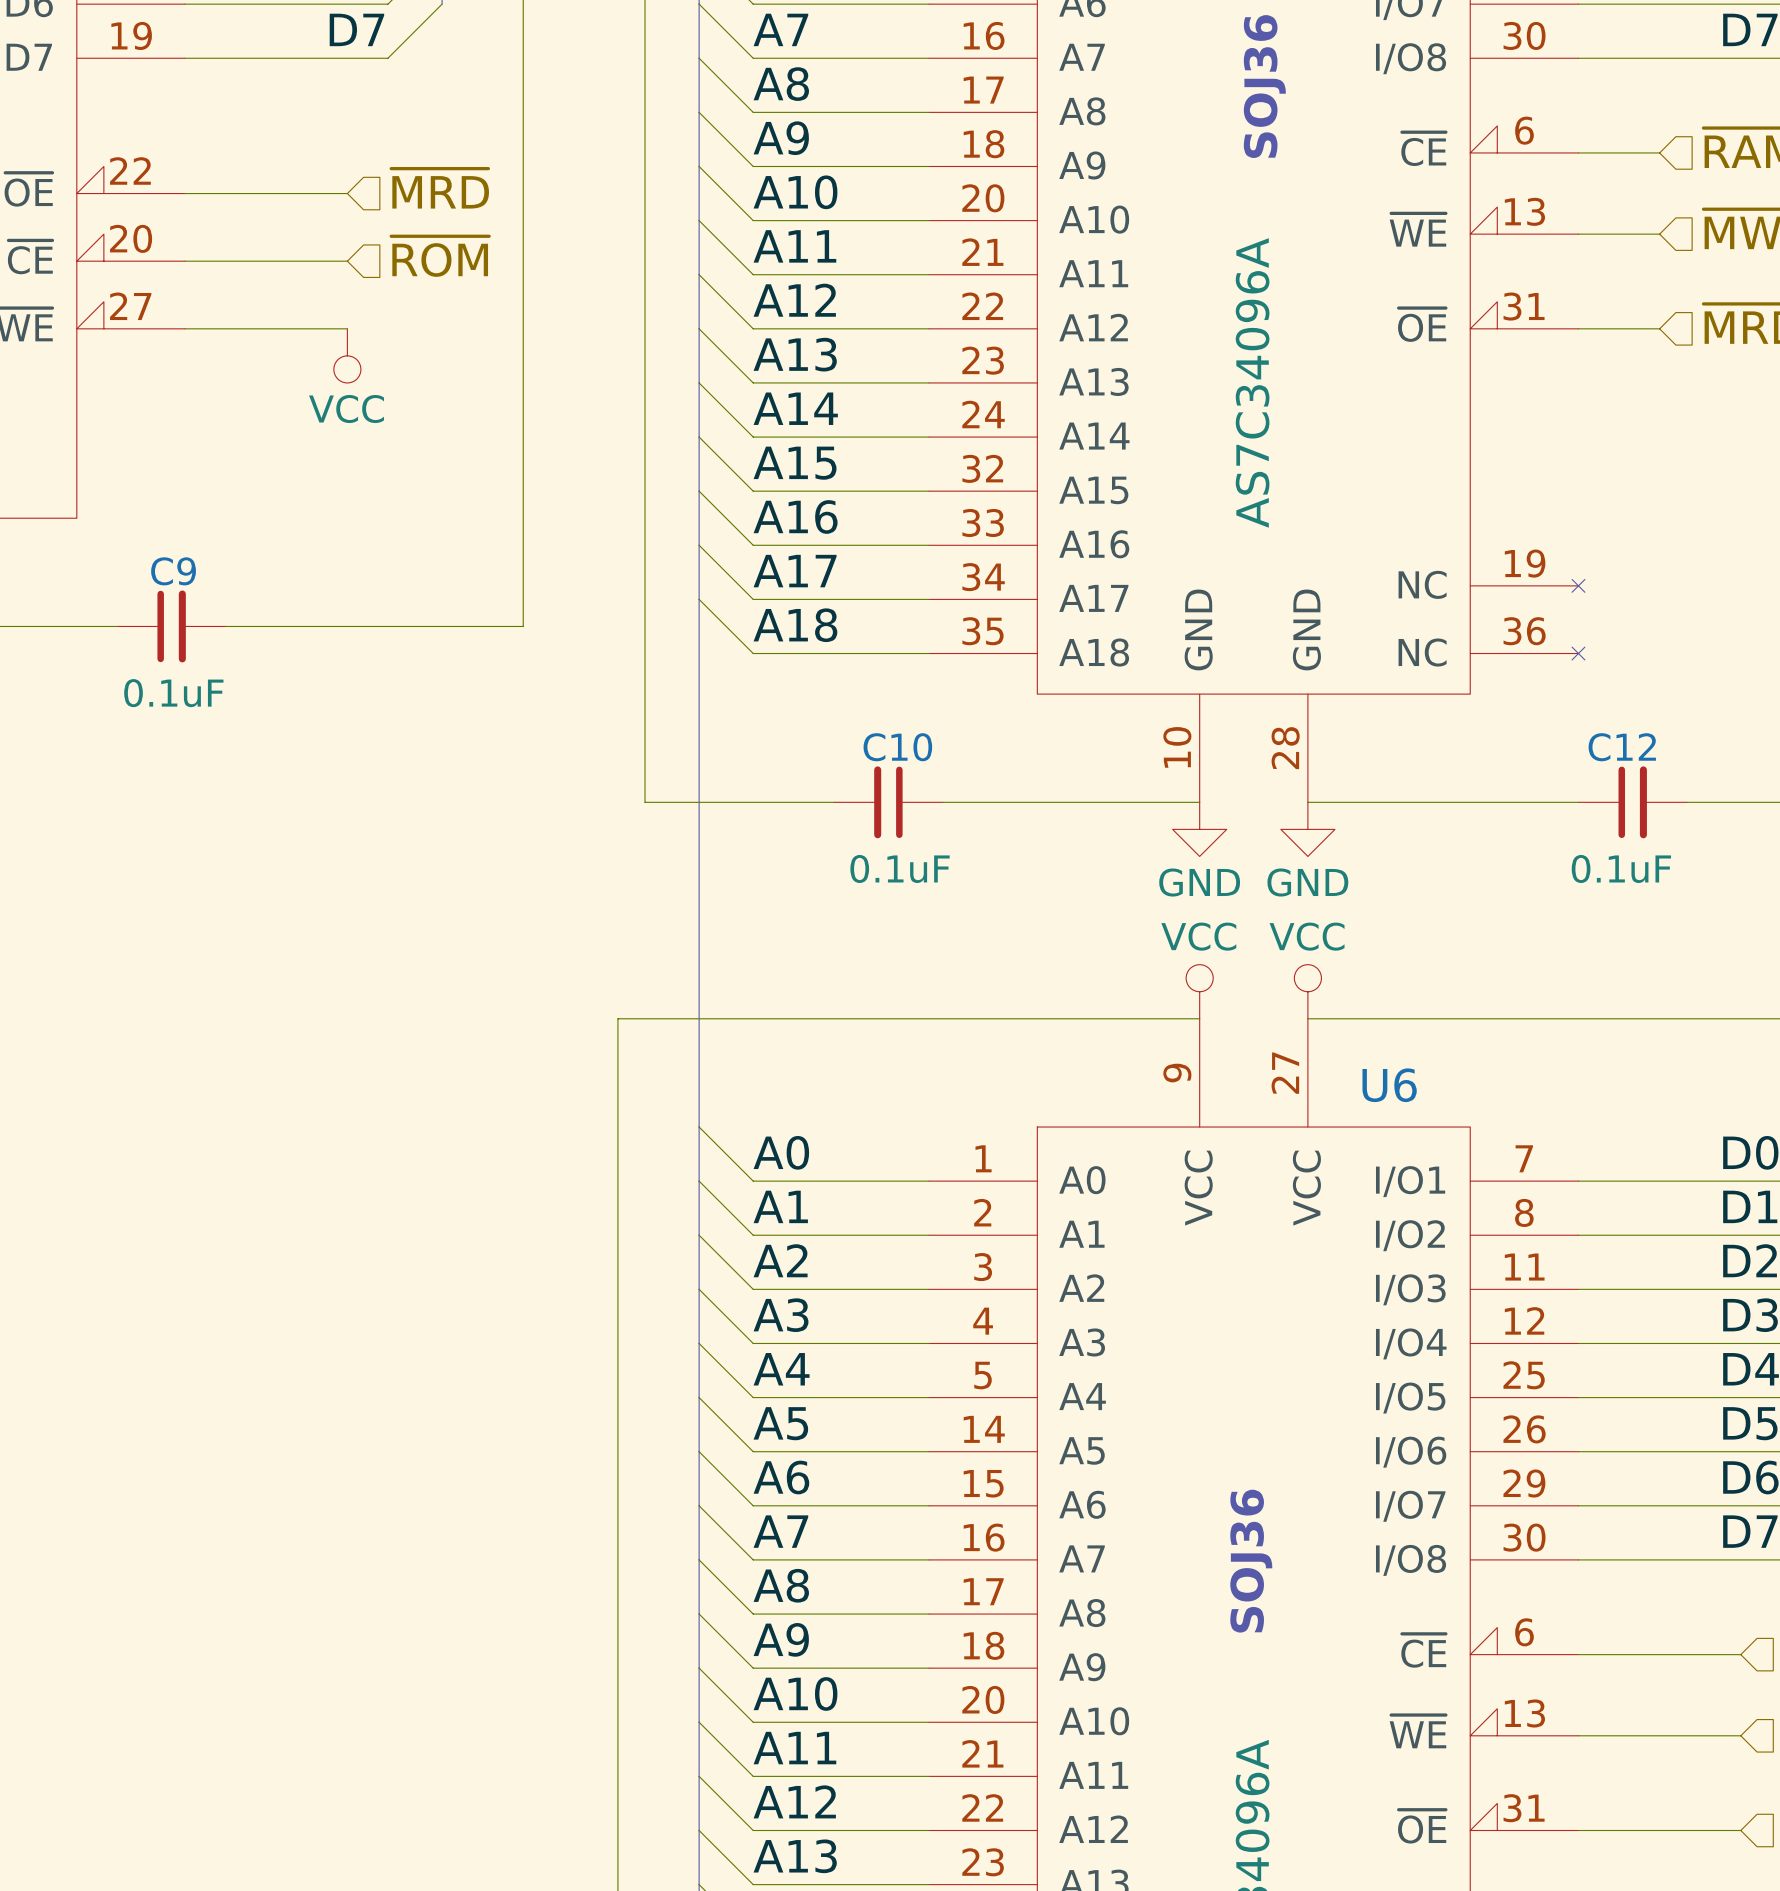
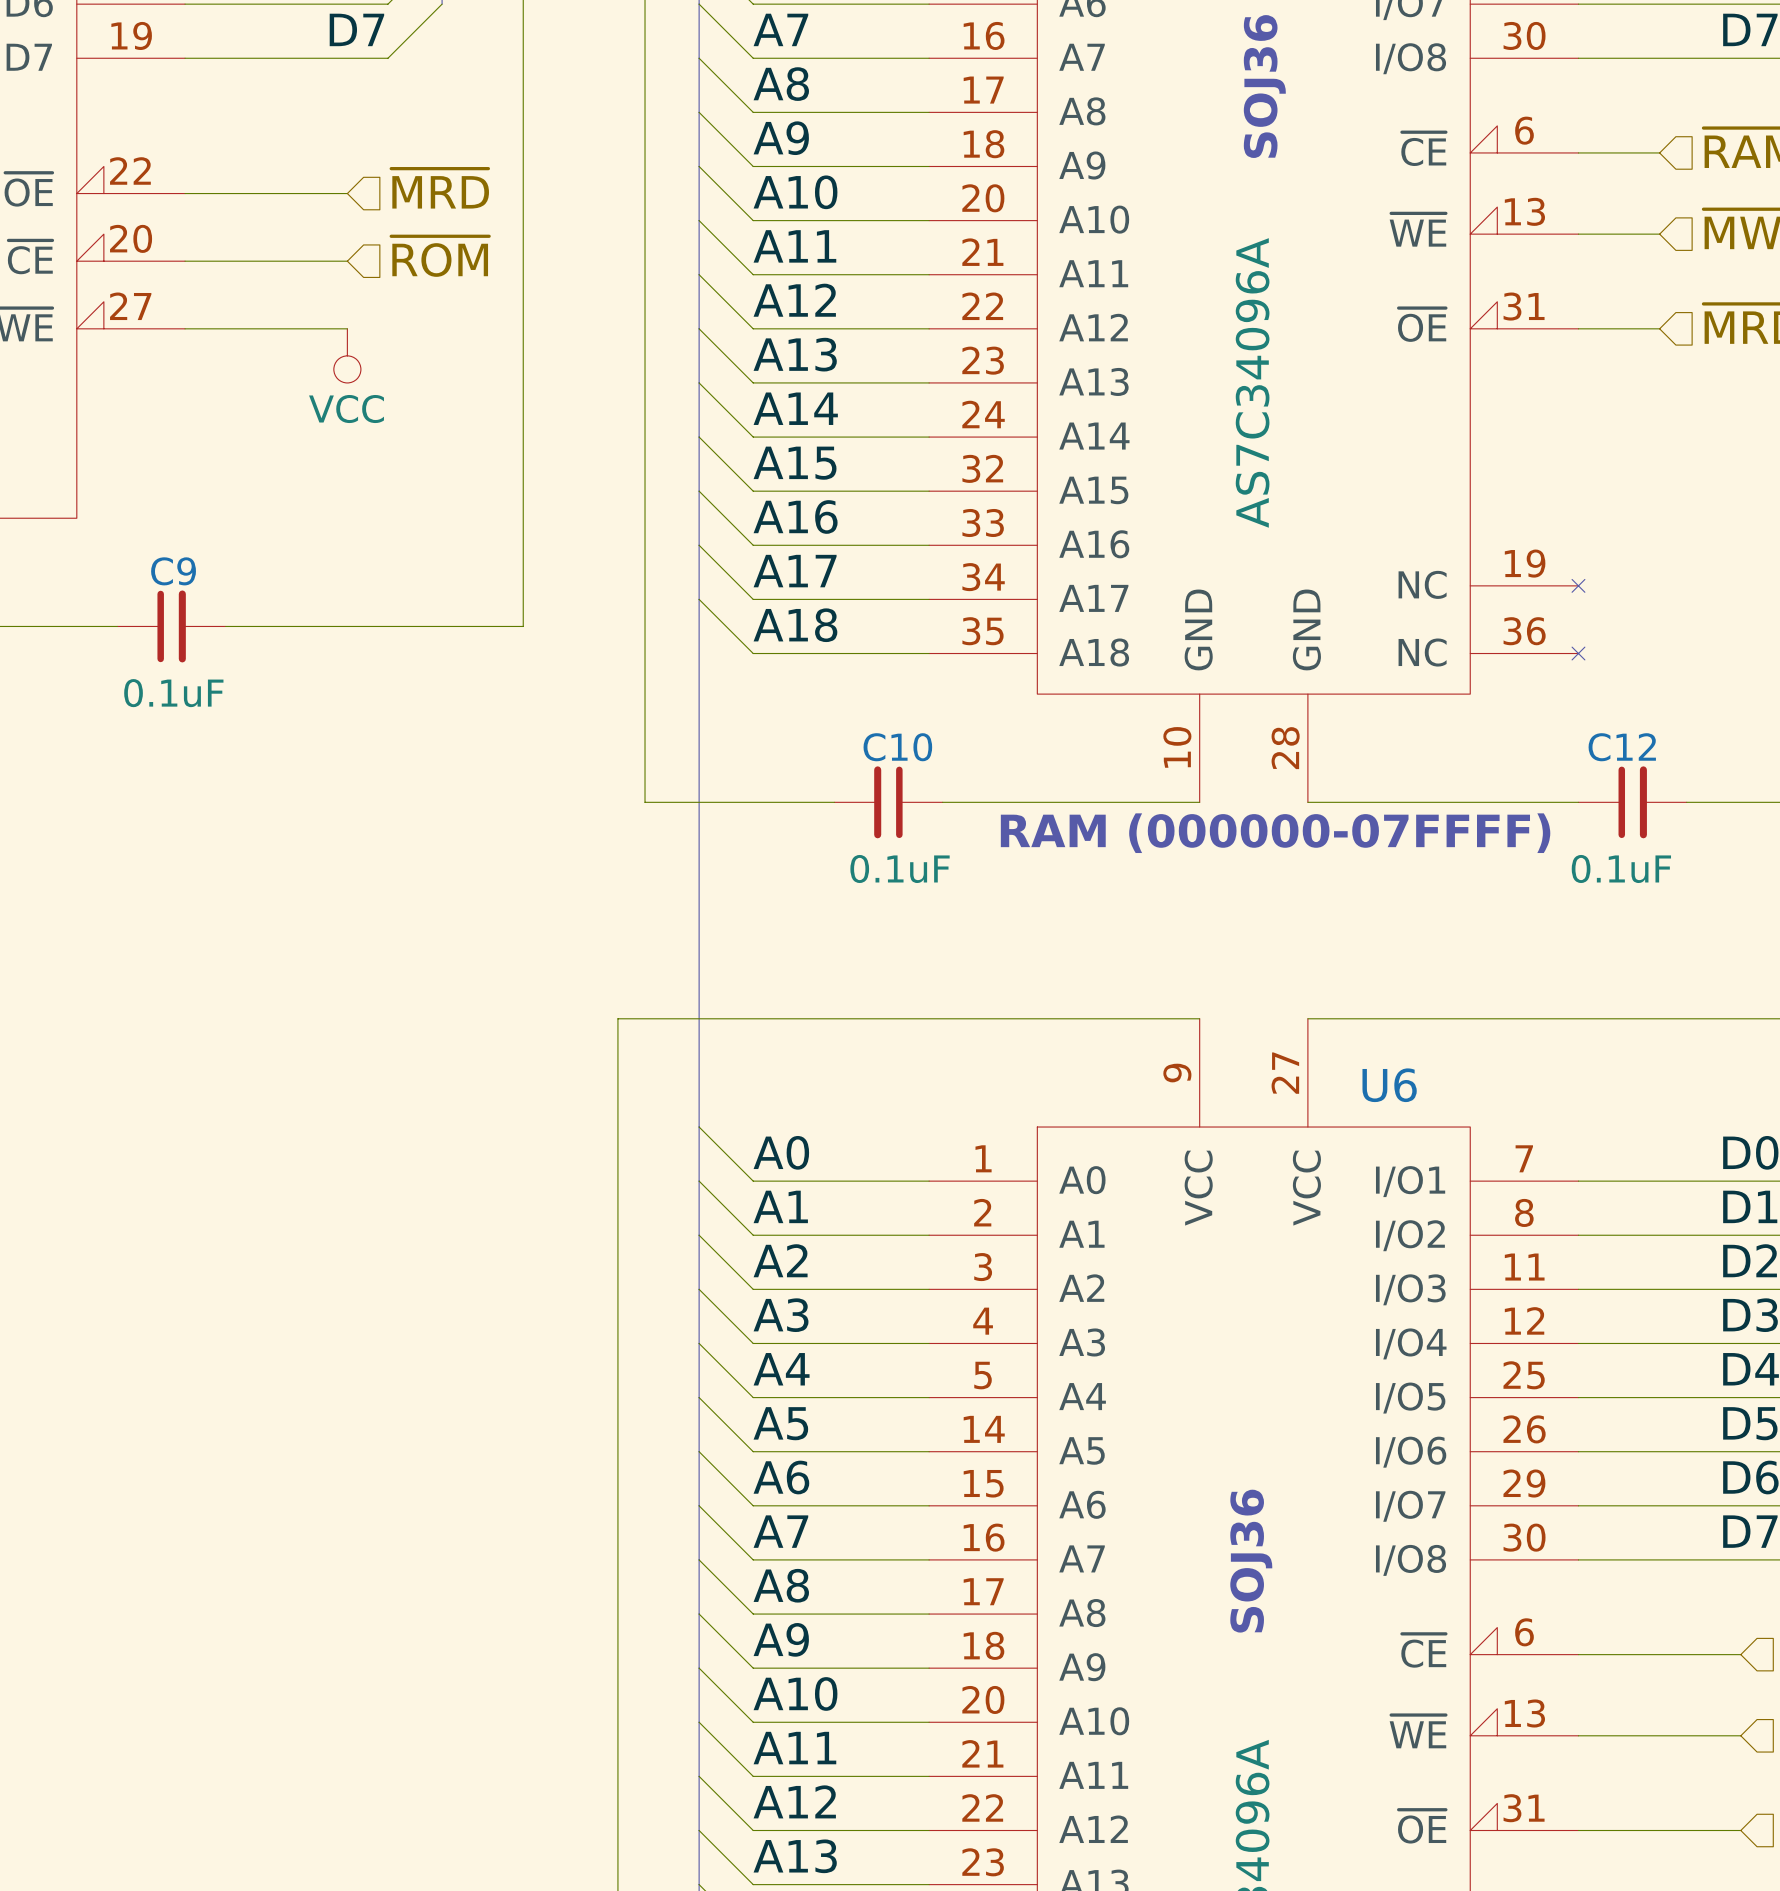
power symbol: GND (1199, 829) -> none
power symbol: GND (1307, 829) -> none
text: none -> RAM (000000-07FFFF) (1275, 833)
power symbol: VCC (1199, 991) -> none
power symbol: VCC (1307, 991) -> none

